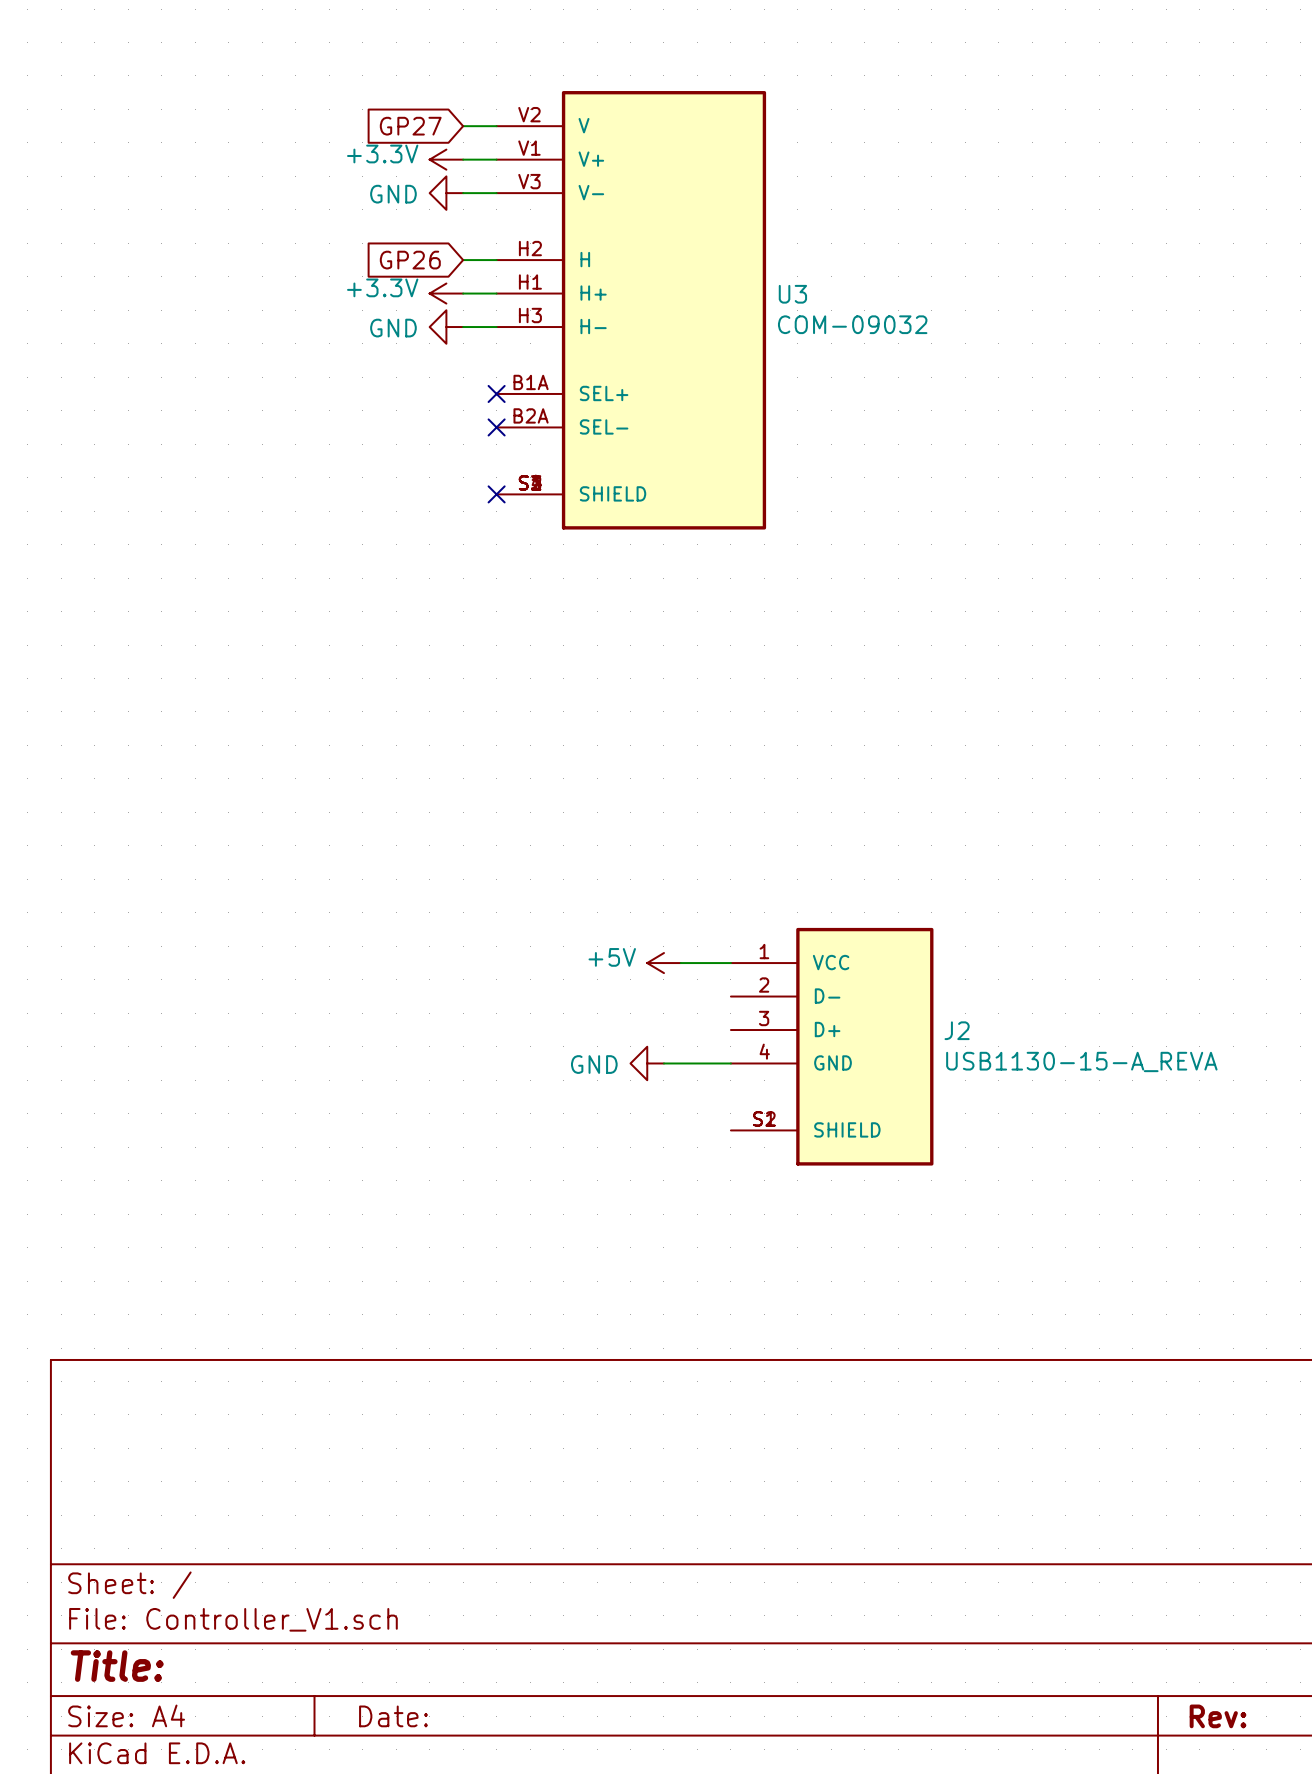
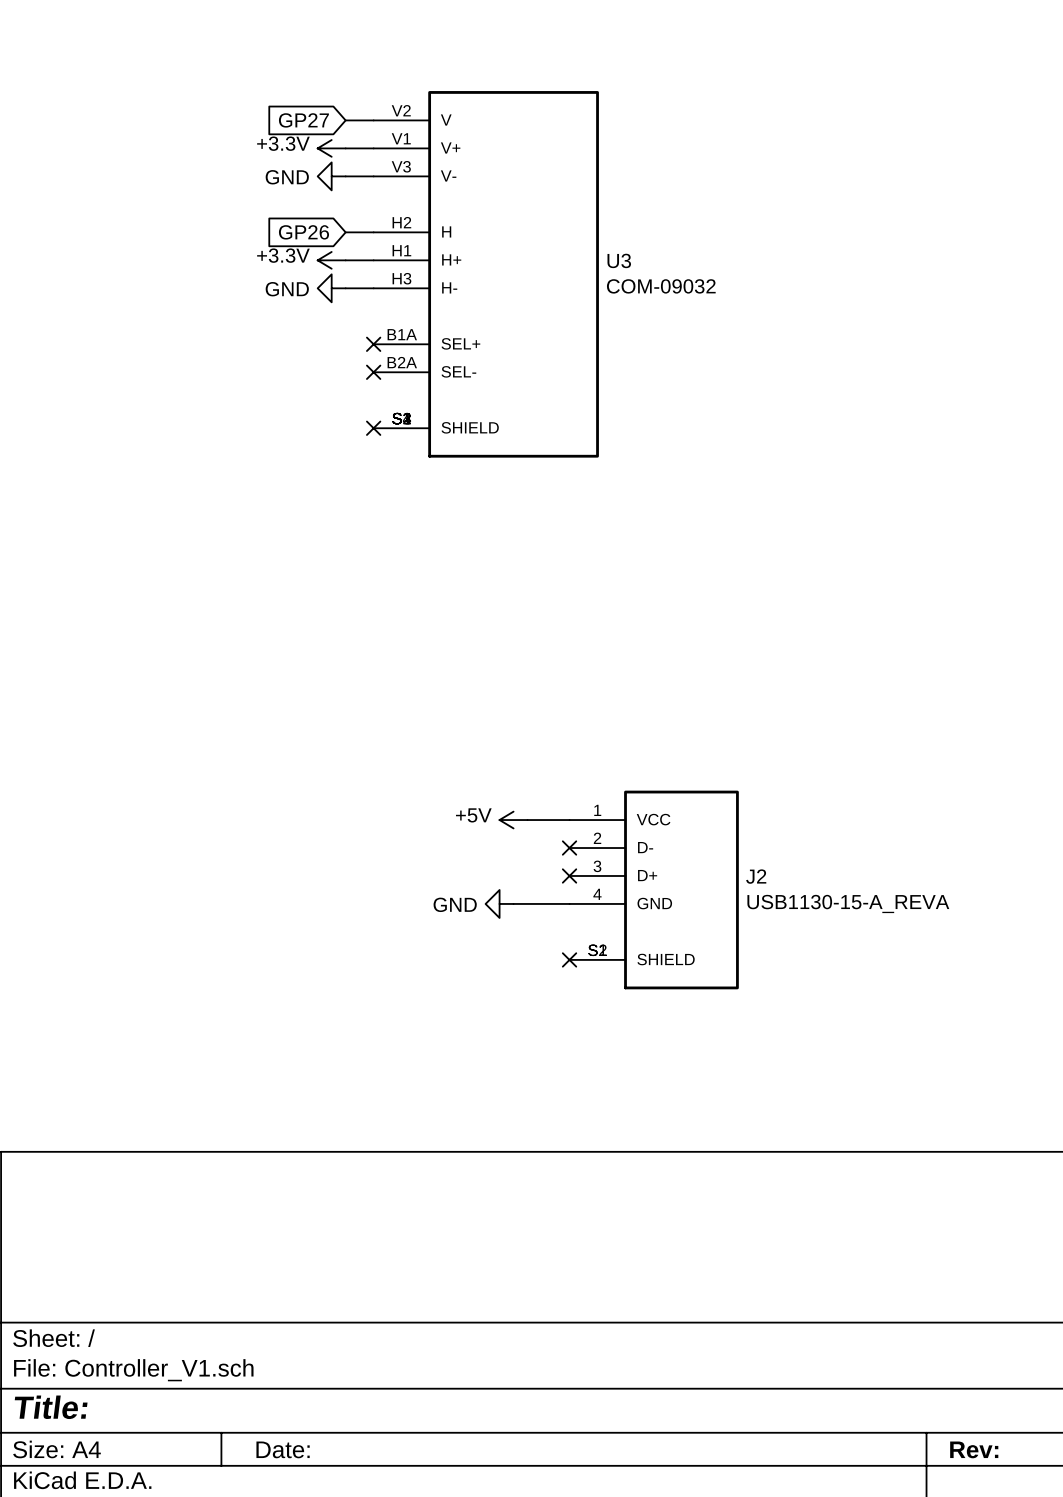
no-connect mark: none -> (569, 848)
no-connect mark: none -> (569, 875)
no-connect mark: none -> (569, 959)

